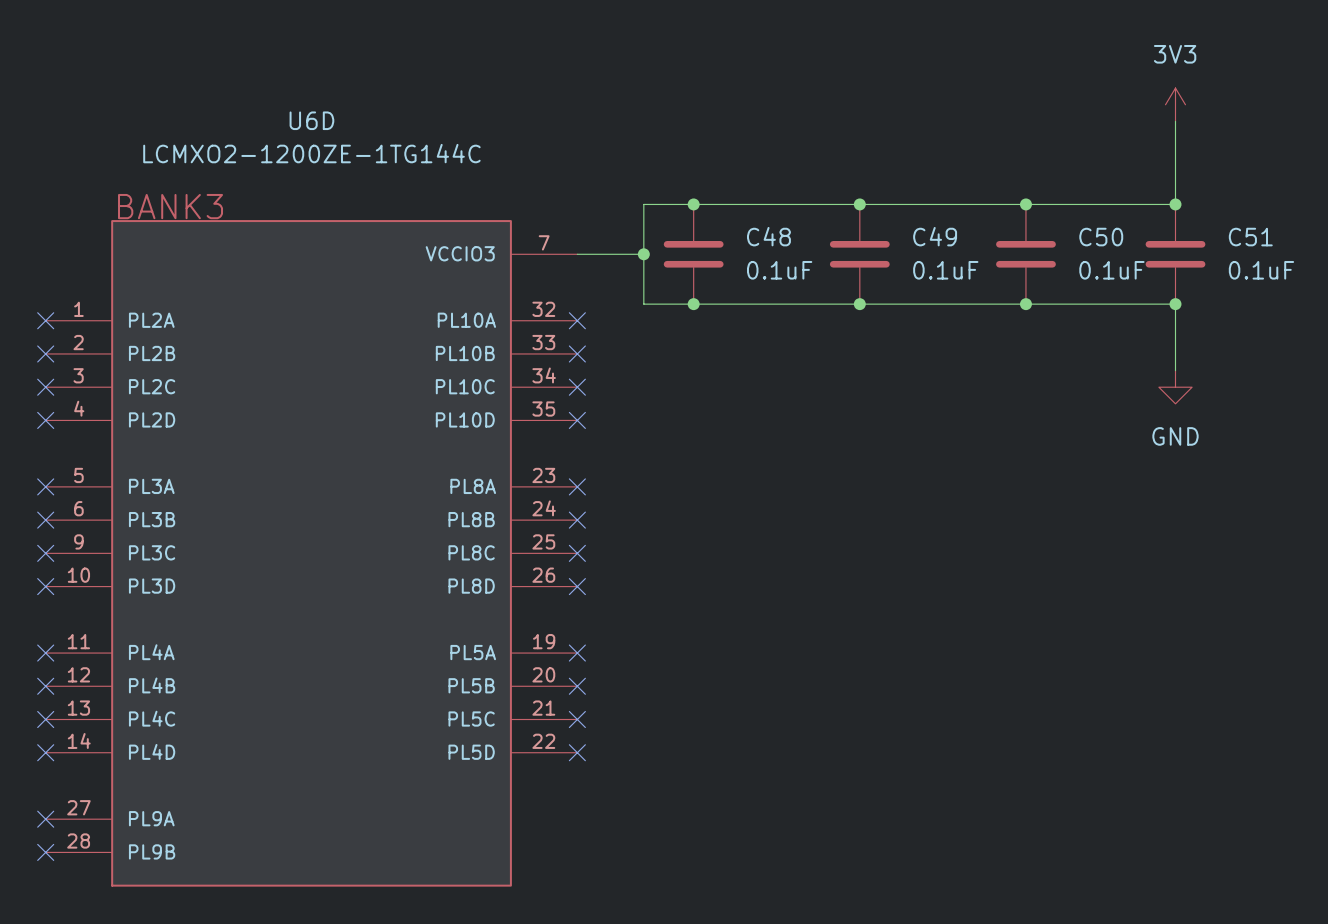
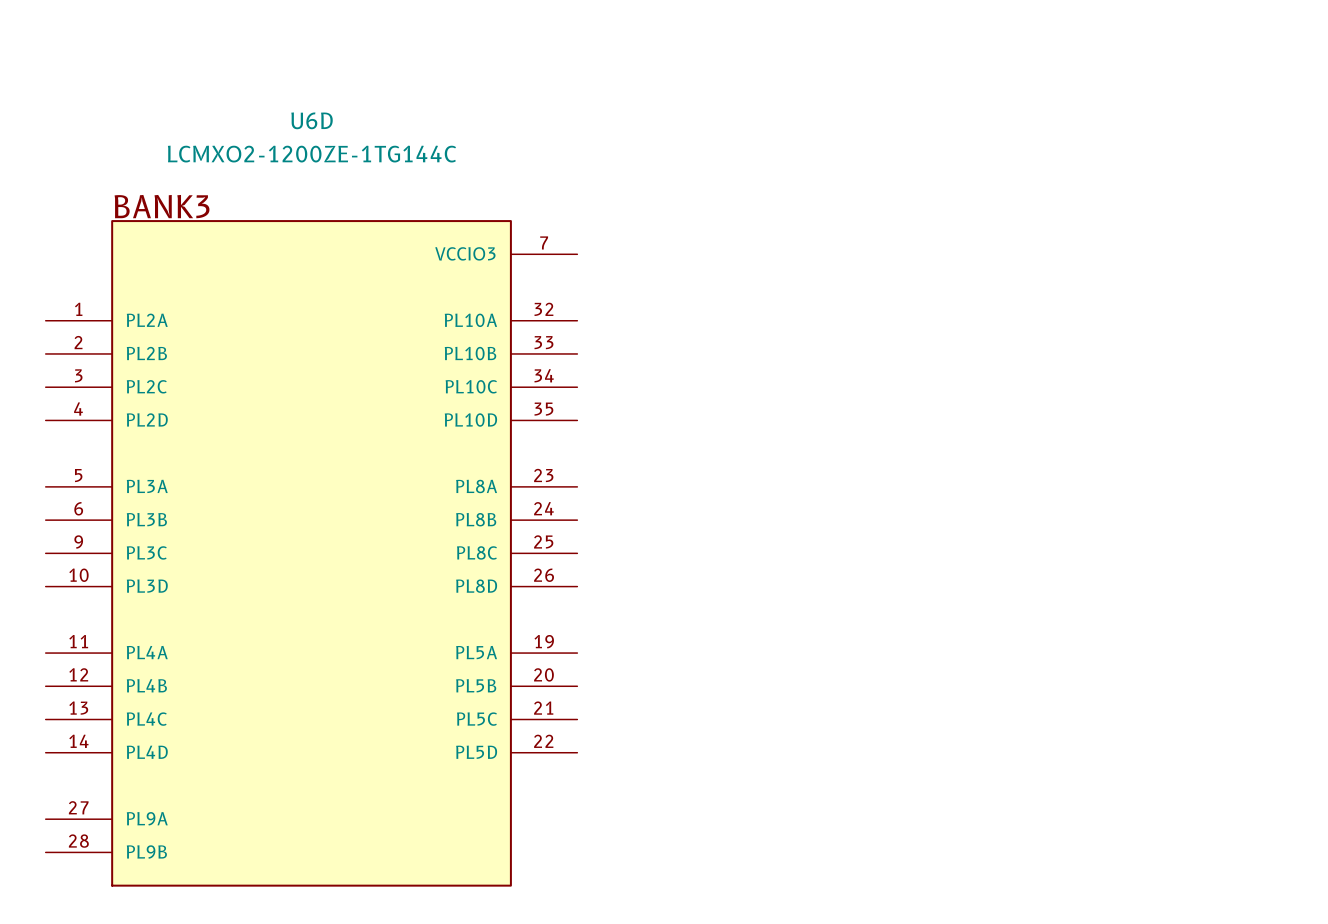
power symbol: 3V3 (1175, 104) -> none
wire: (1175, 121) (1175, 204) (643, 204) (643, 304) (1175, 304) (1175, 370) -> none
junction: (693, 204) -> none
junction: (859, 204) -> none
junction: (1025, 204) -> none
junction: (1175, 204) -> none
wire: (577, 254) (643, 254) -> none
junction: (643, 254) -> none
C48: 0.1uF (693, 254) -> none
C49: 0.1uF (859, 254) -> none
C50: 0.1uF (1025, 254) -> none
C51: 0.1uF (1175, 254) -> none
junction: (693, 304) -> none
junction: (859, 304) -> none
junction: (1025, 304) -> none
junction: (1175, 304) -> none
no-connect mark: (45, 320) -> none
no-connect mark: (577, 320) -> none
no-connect mark: (45, 353) -> none
no-connect mark: (577, 353) -> none
no-connect mark: (45, 387) -> none
no-connect mark: (577, 387) -> none
power symbol: GND (1175, 387) -> none
no-connect mark: (45, 420) -> none
no-connect mark: (577, 420) -> none
no-connect mark: (45, 486) -> none
no-connect mark: (577, 486) -> none
no-connect mark: (45, 520) -> none
no-connect mark: (577, 520) -> none
no-connect mark: (45, 553) -> none
no-connect mark: (577, 553) -> none
no-connect mark: (45, 586) -> none
no-connect mark: (577, 586) -> none
no-connect mark: (45, 653) -> none
no-connect mark: (577, 653) -> none
no-connect mark: (45, 686) -> none
no-connect mark: (577, 686) -> none
no-connect mark: (45, 719) -> none
no-connect mark: (577, 719) -> none
no-connect mark: (45, 752) -> none
no-connect mark: (577, 752) -> none
no-connect mark: (45, 819) -> none
no-connect mark: (45, 852) -> none

